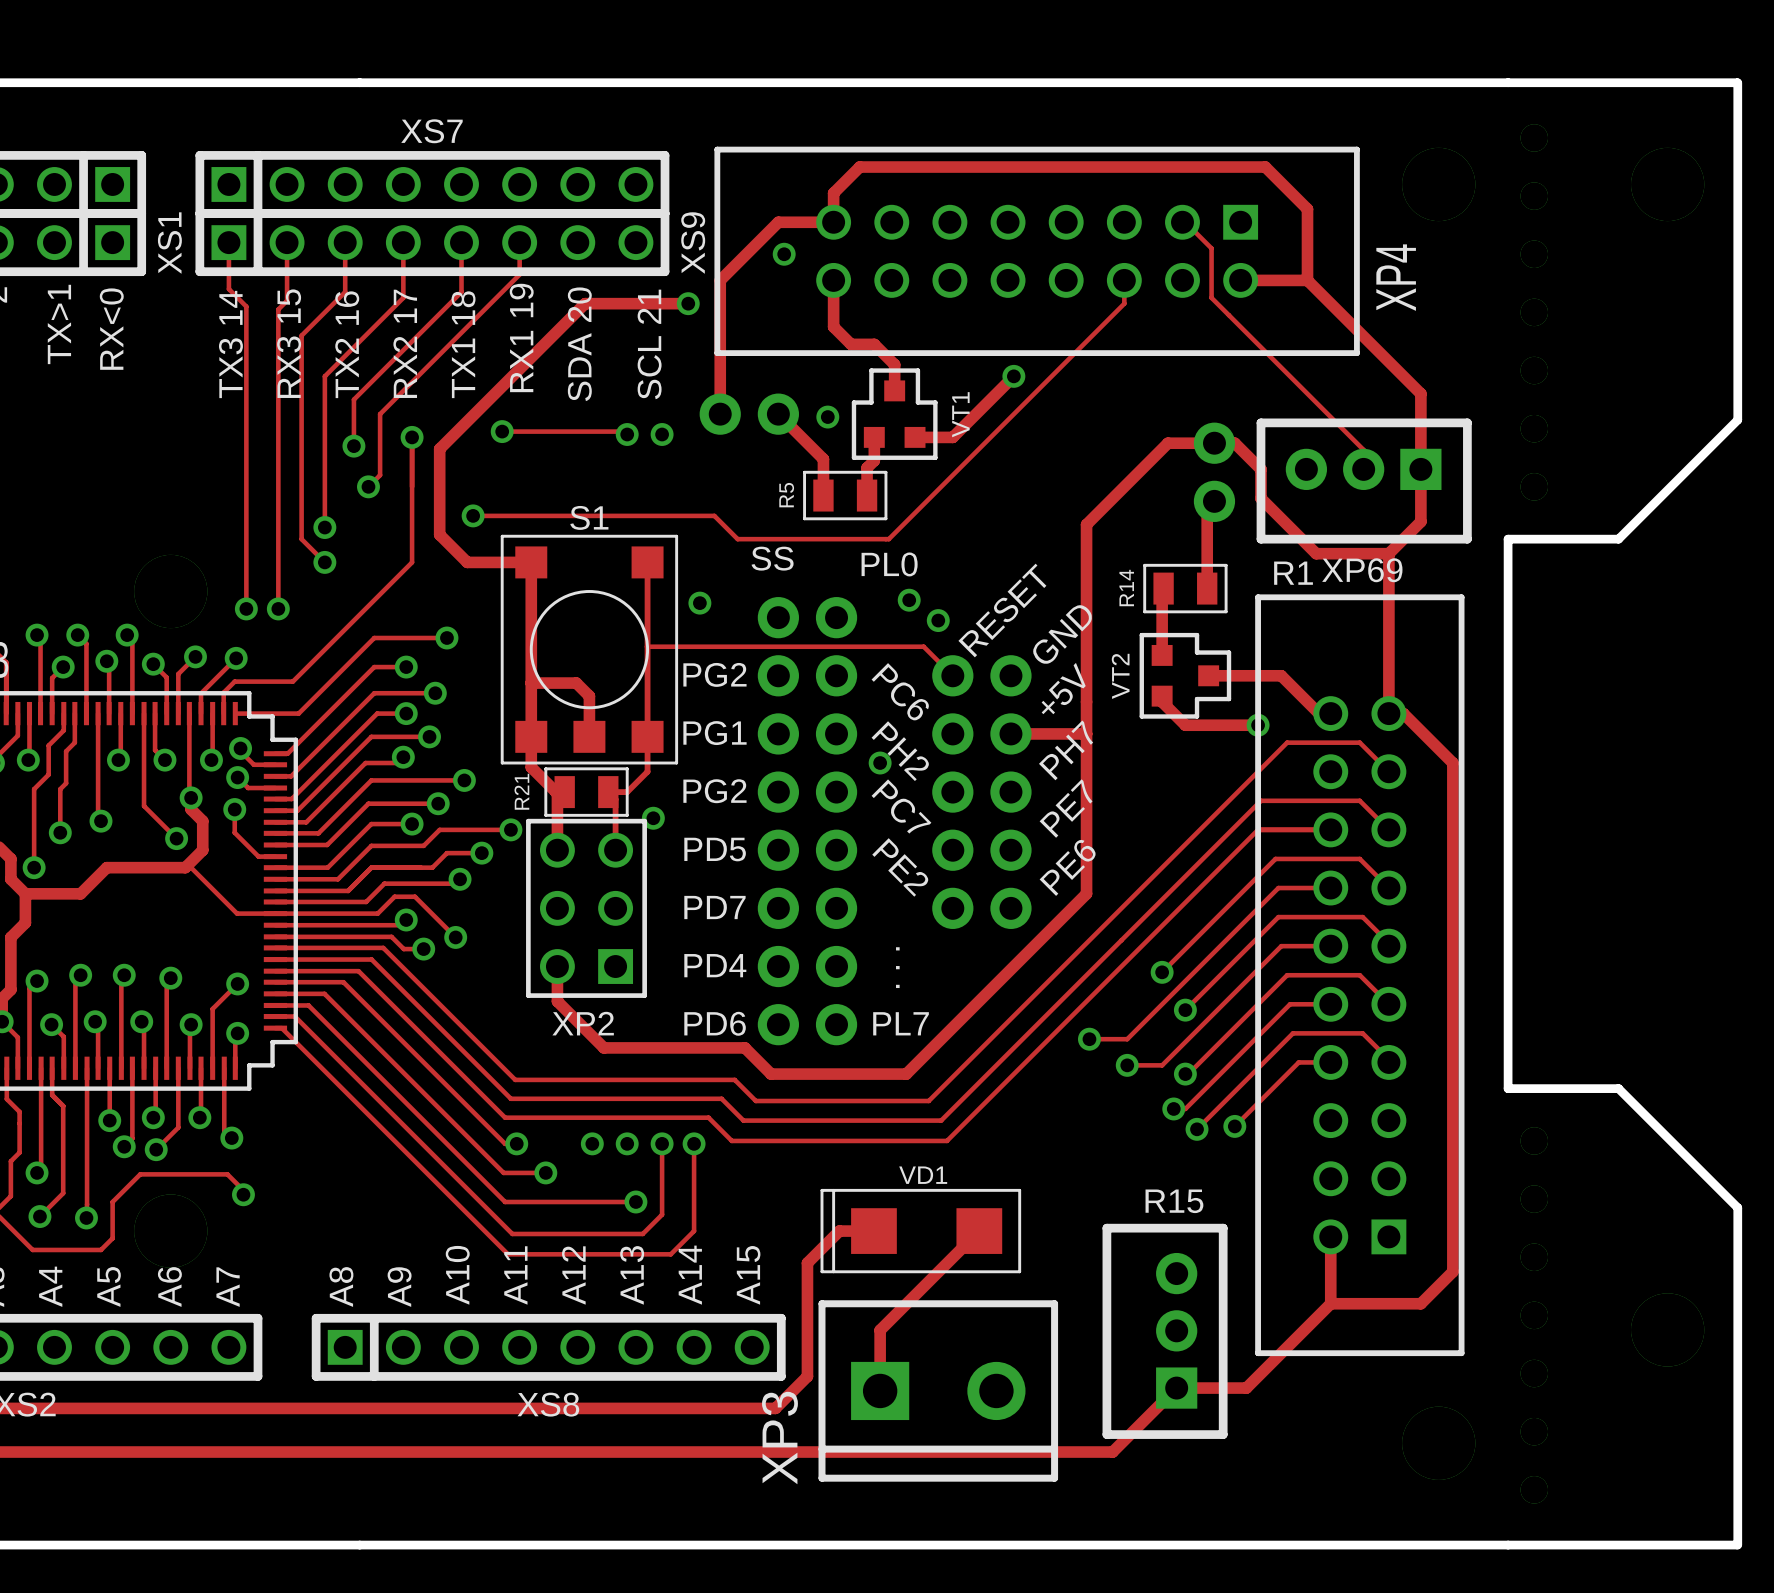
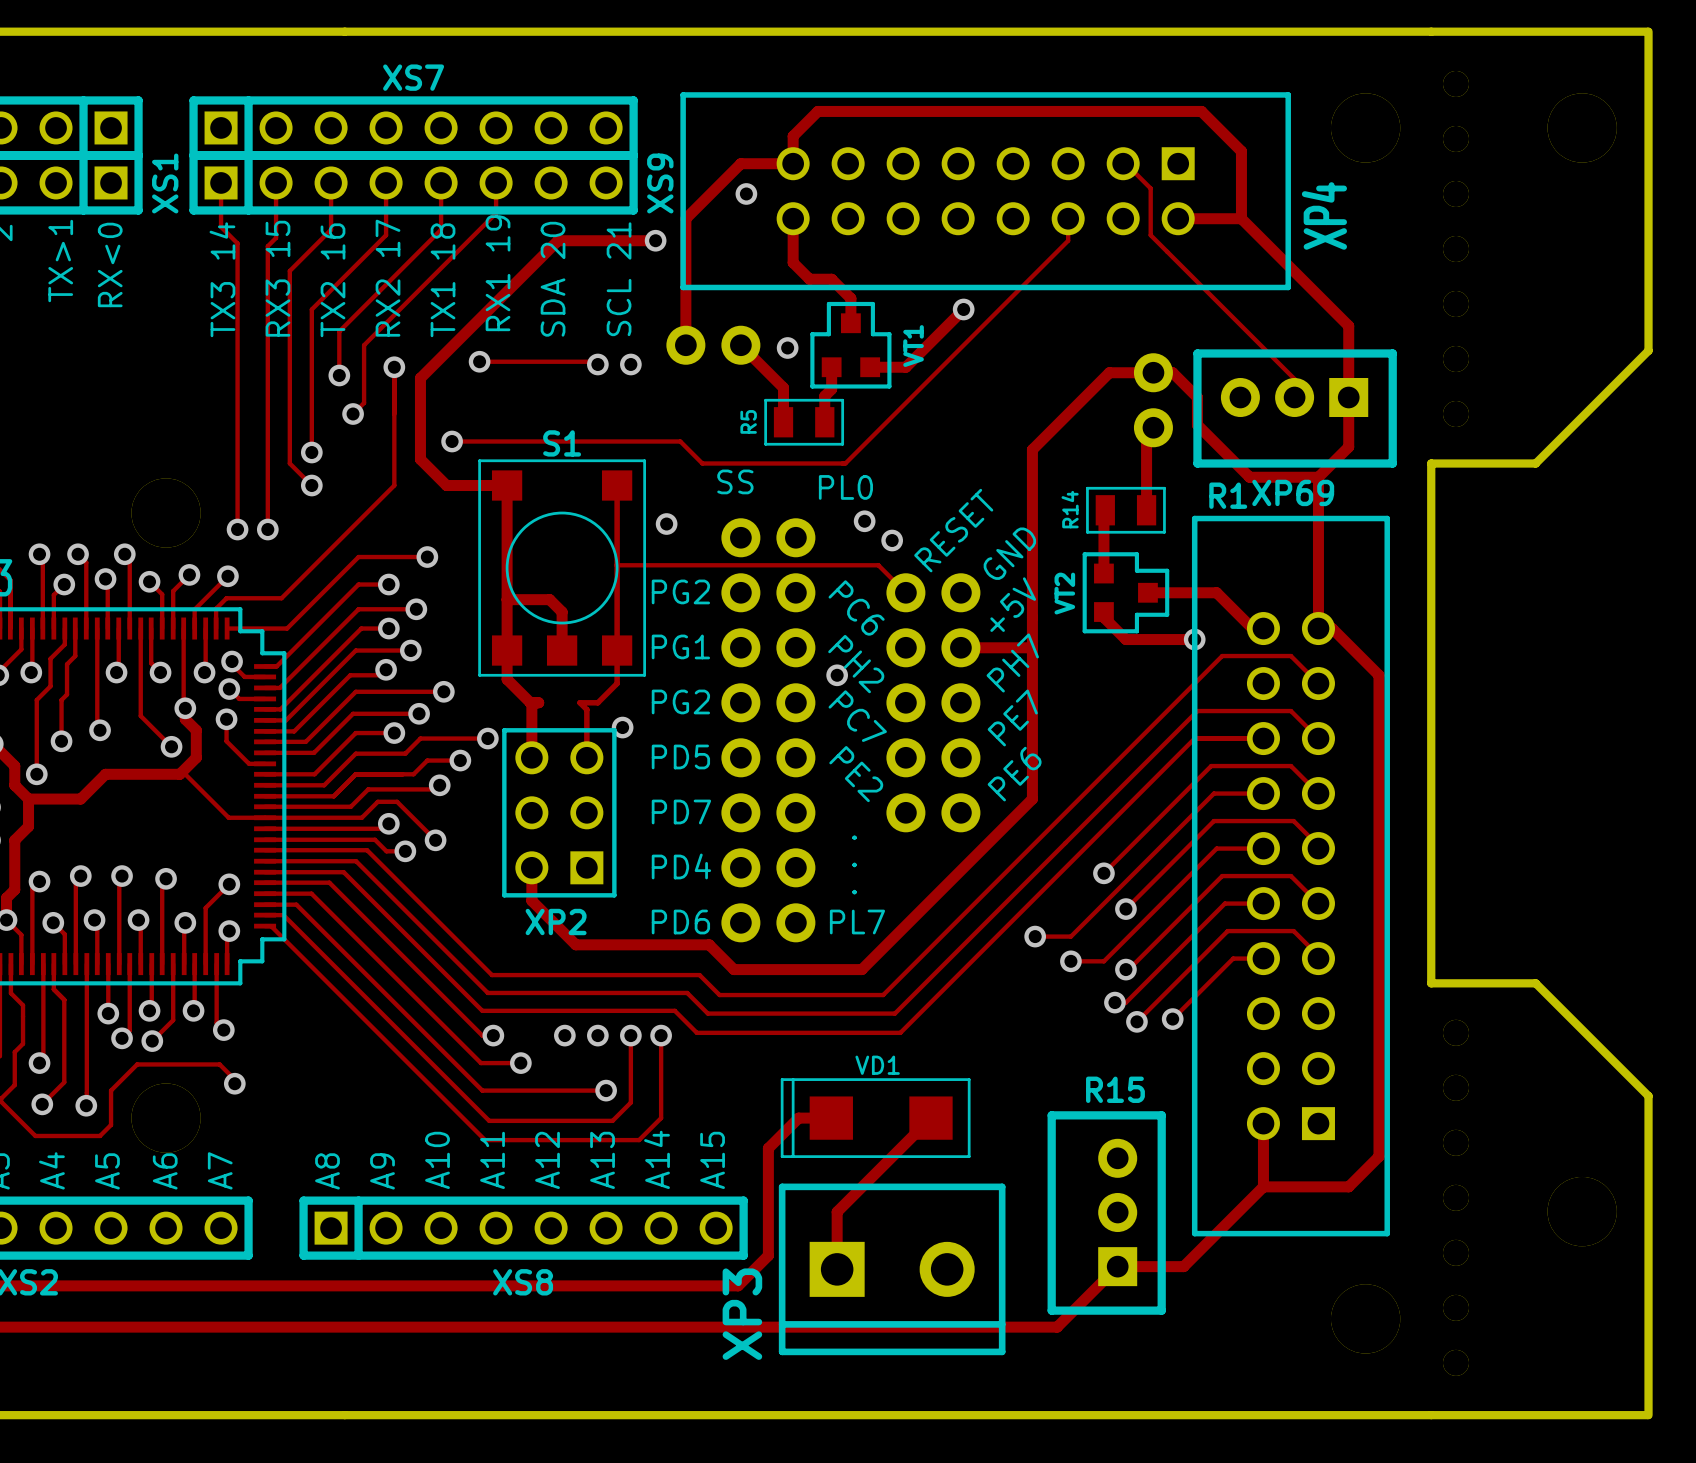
R21: (586, 792) -> none

